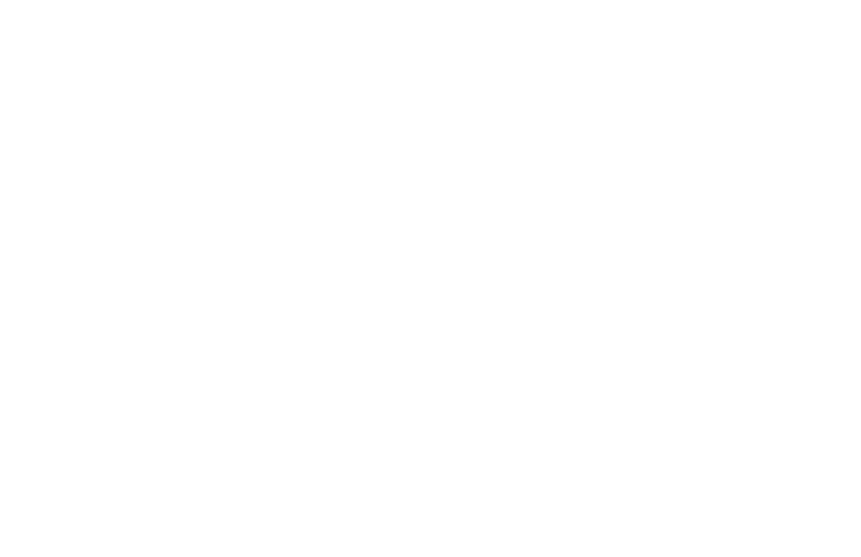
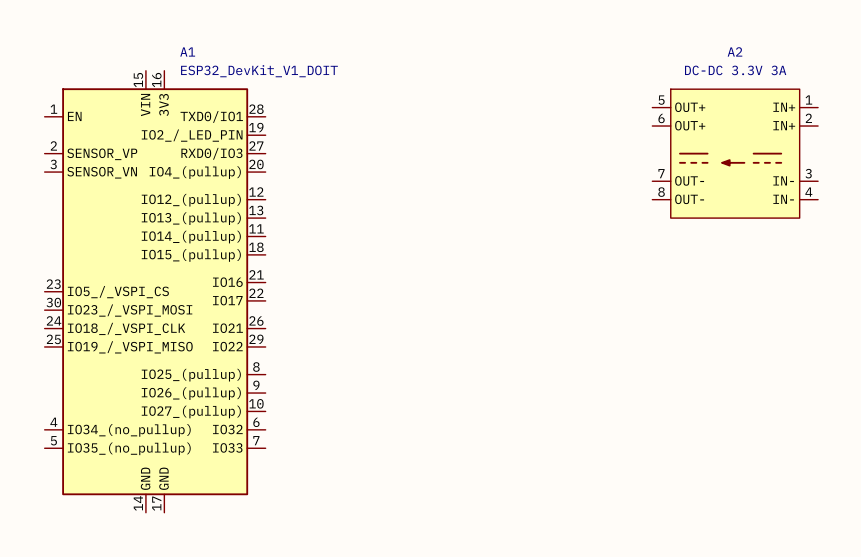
A2: none -> DC-DC 3.3V 3A (735, 153)
A1: none -> ESP32_DevKit_V1_DOIT (155, 291)

